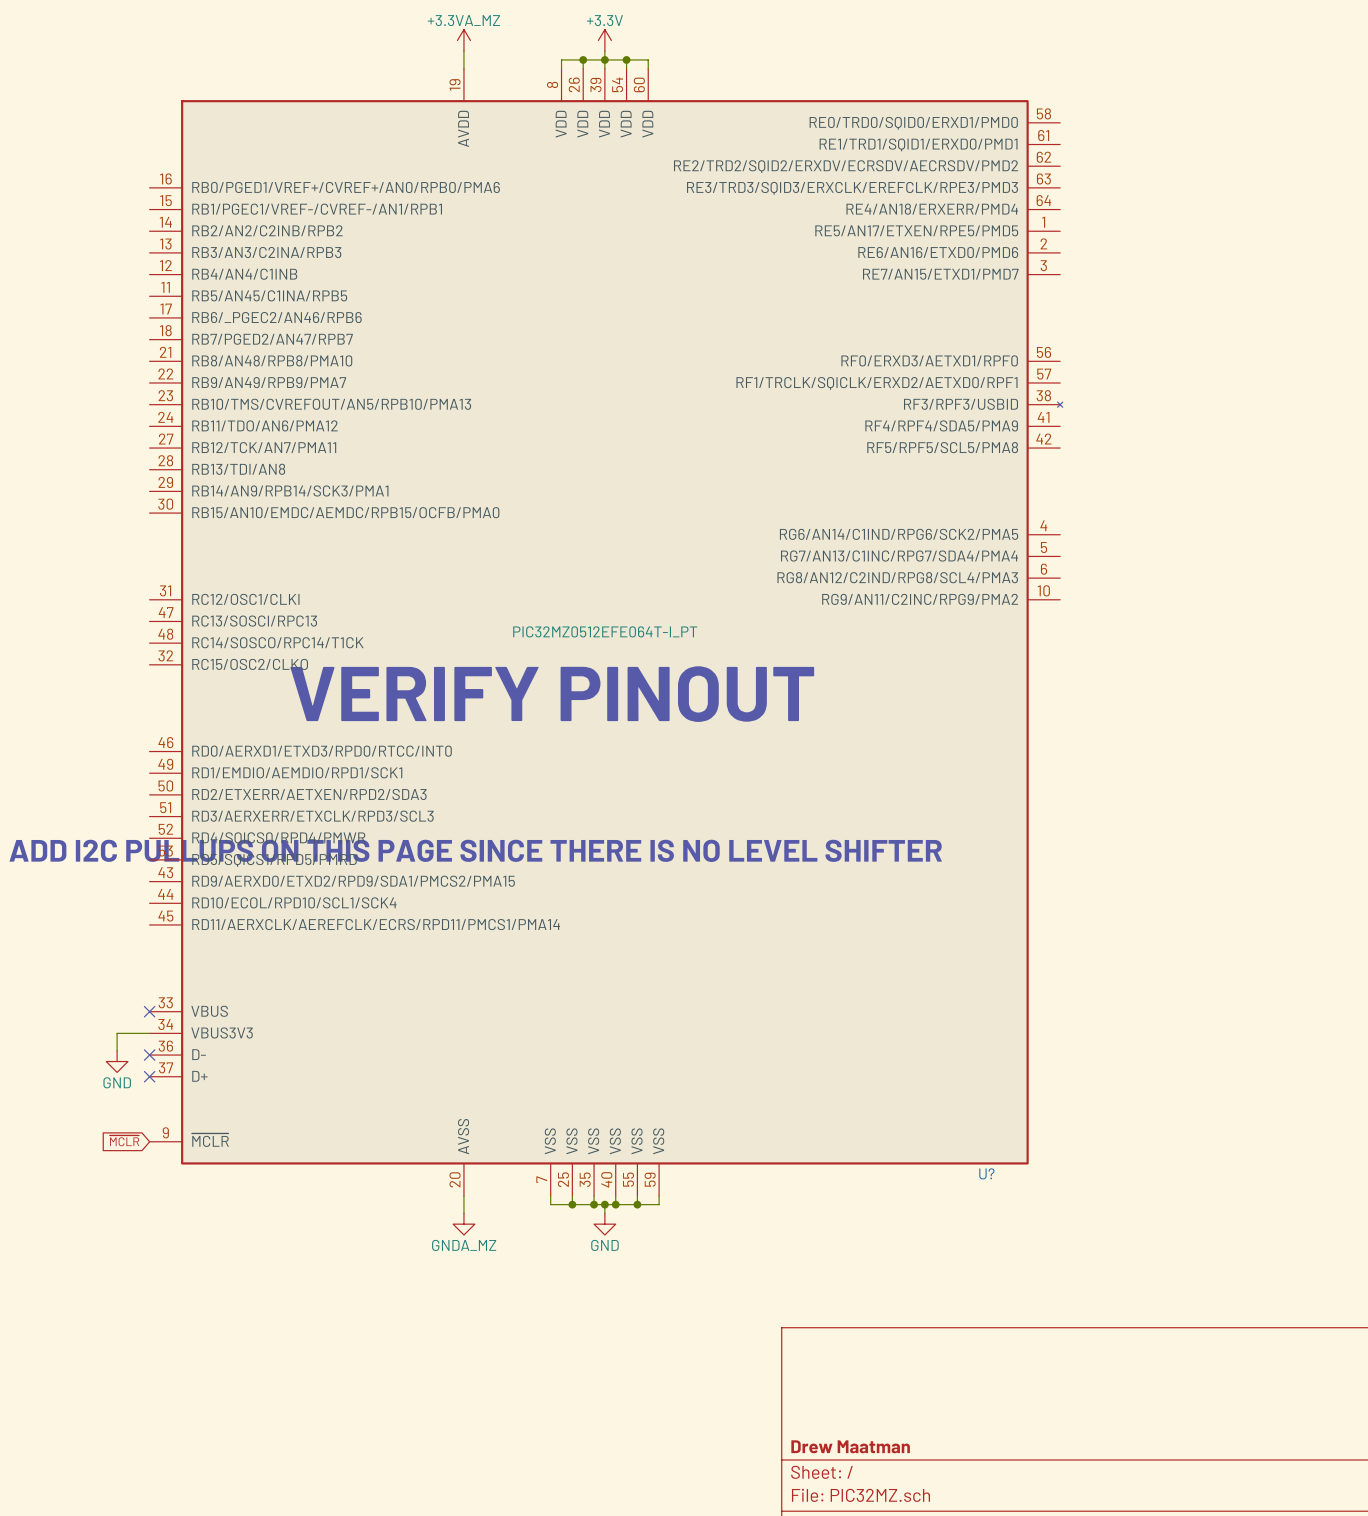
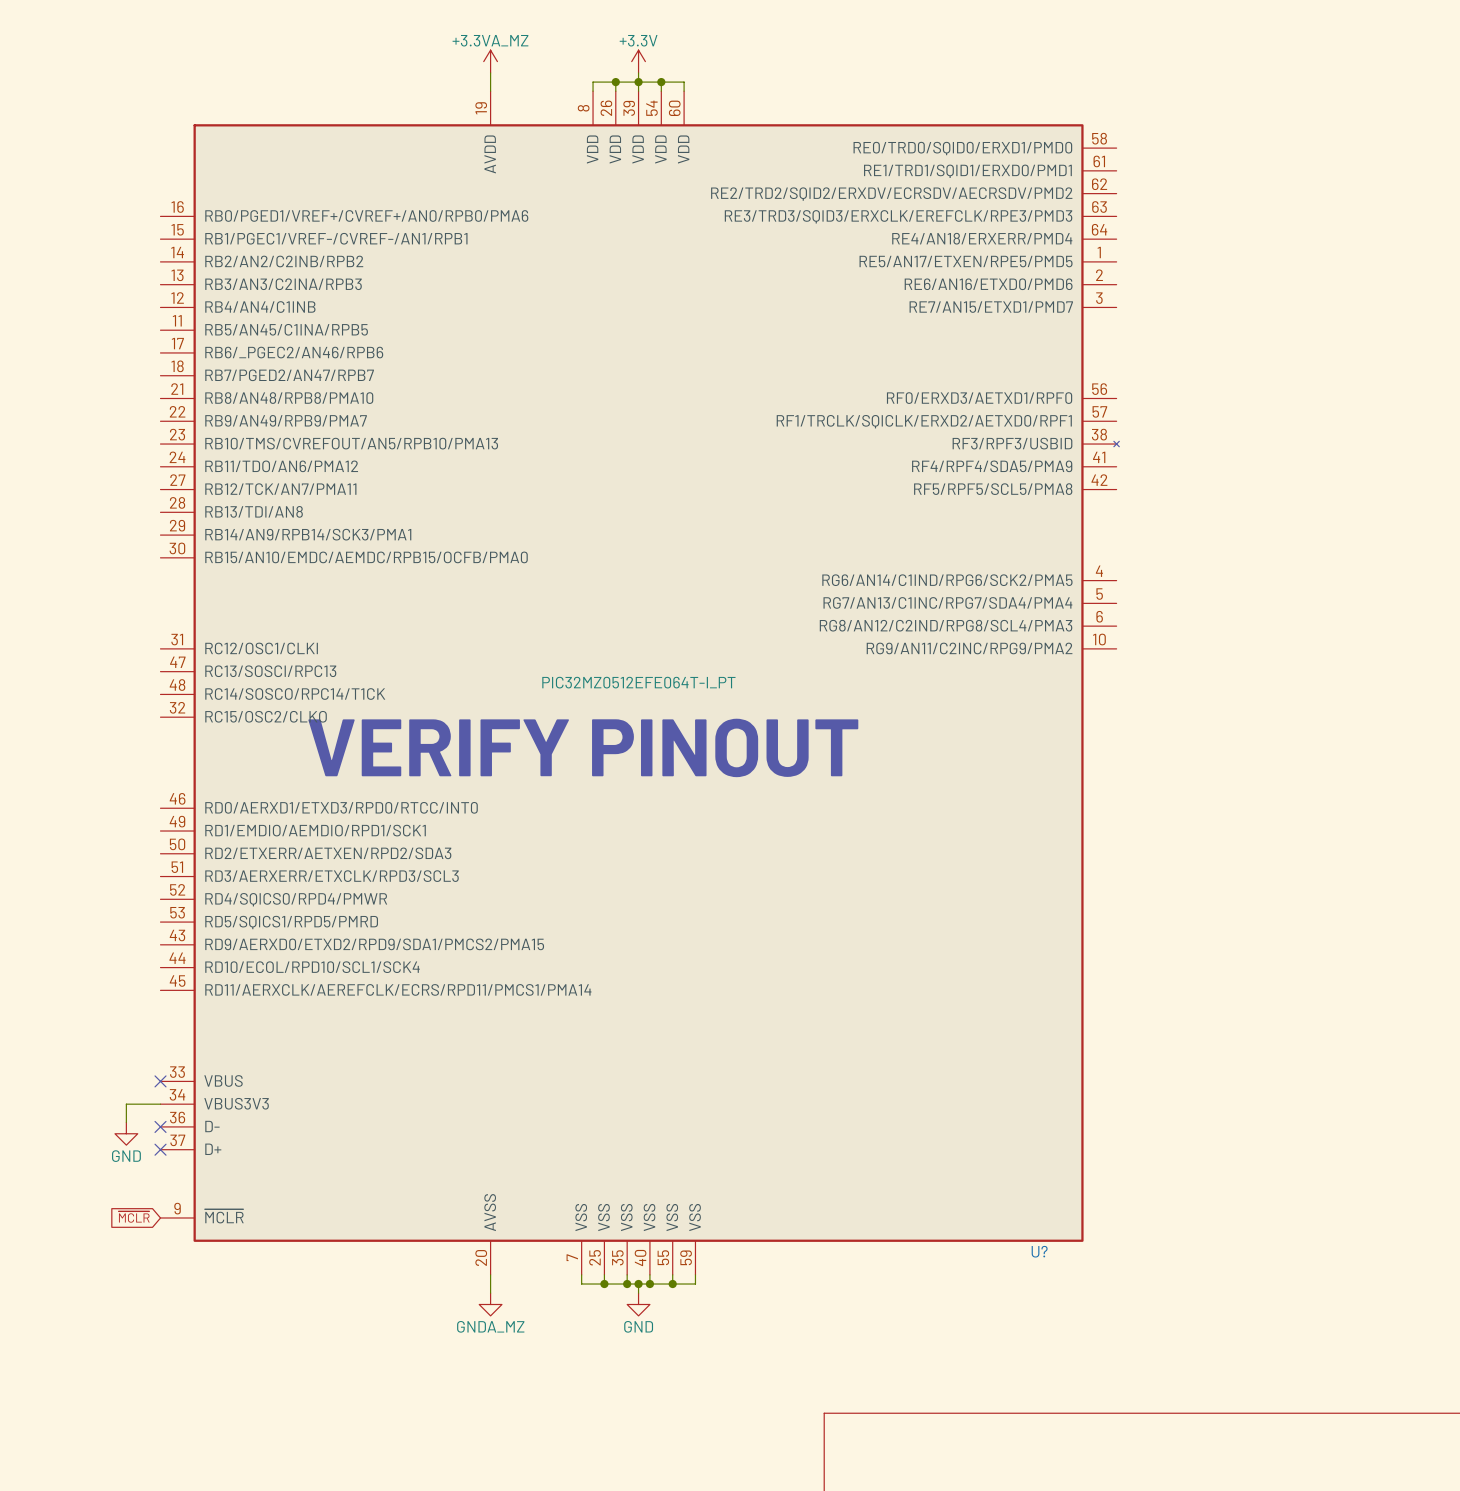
text: ADD I2C PULLUPS ON THIS PAGE SINCE THERE IS NO LEVEL SHIFTER (475, 850) -> none

